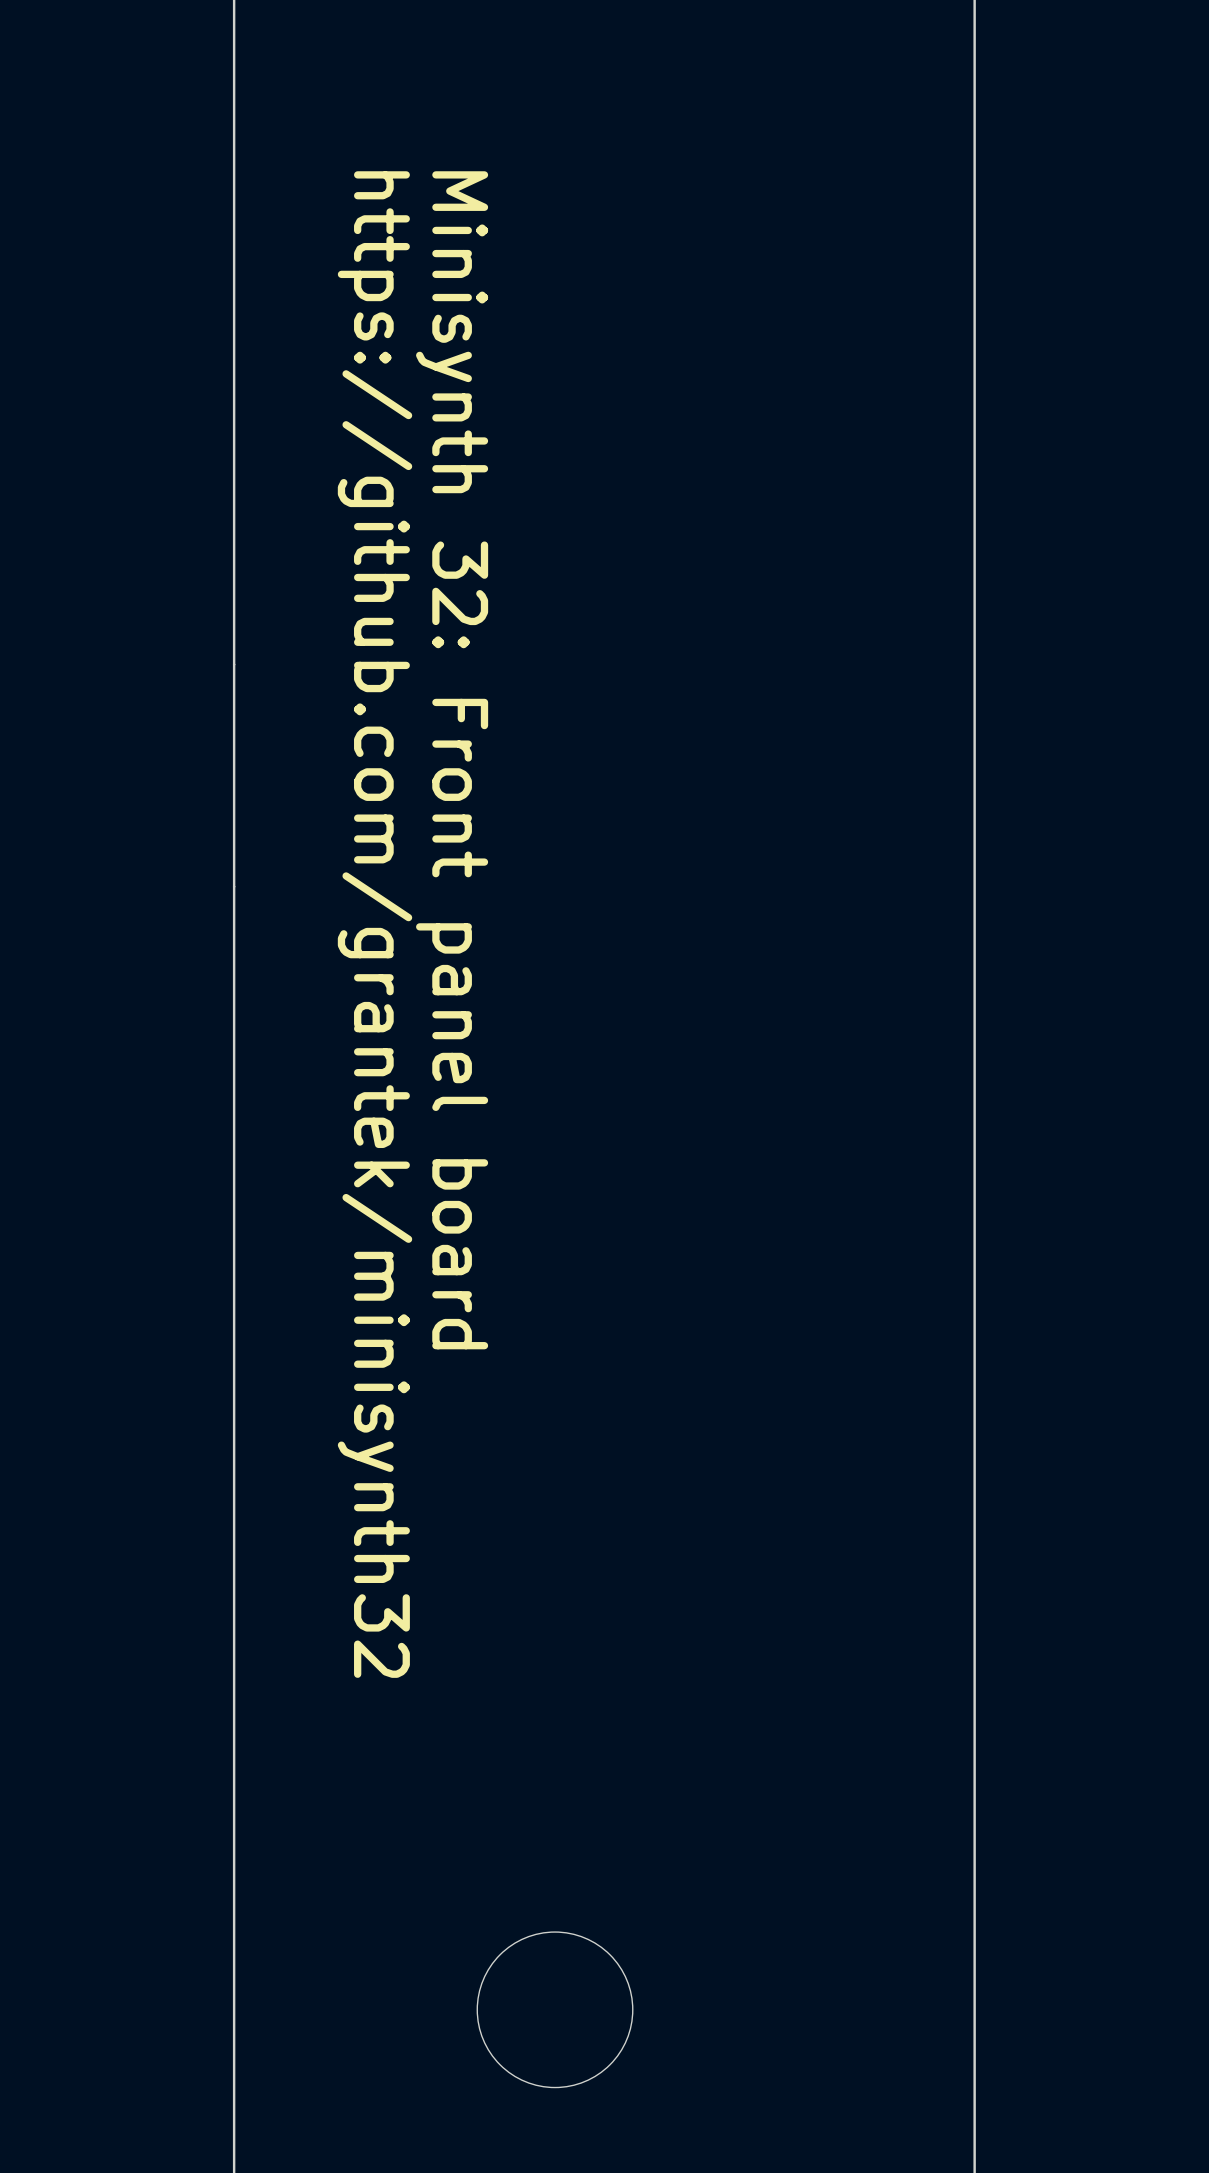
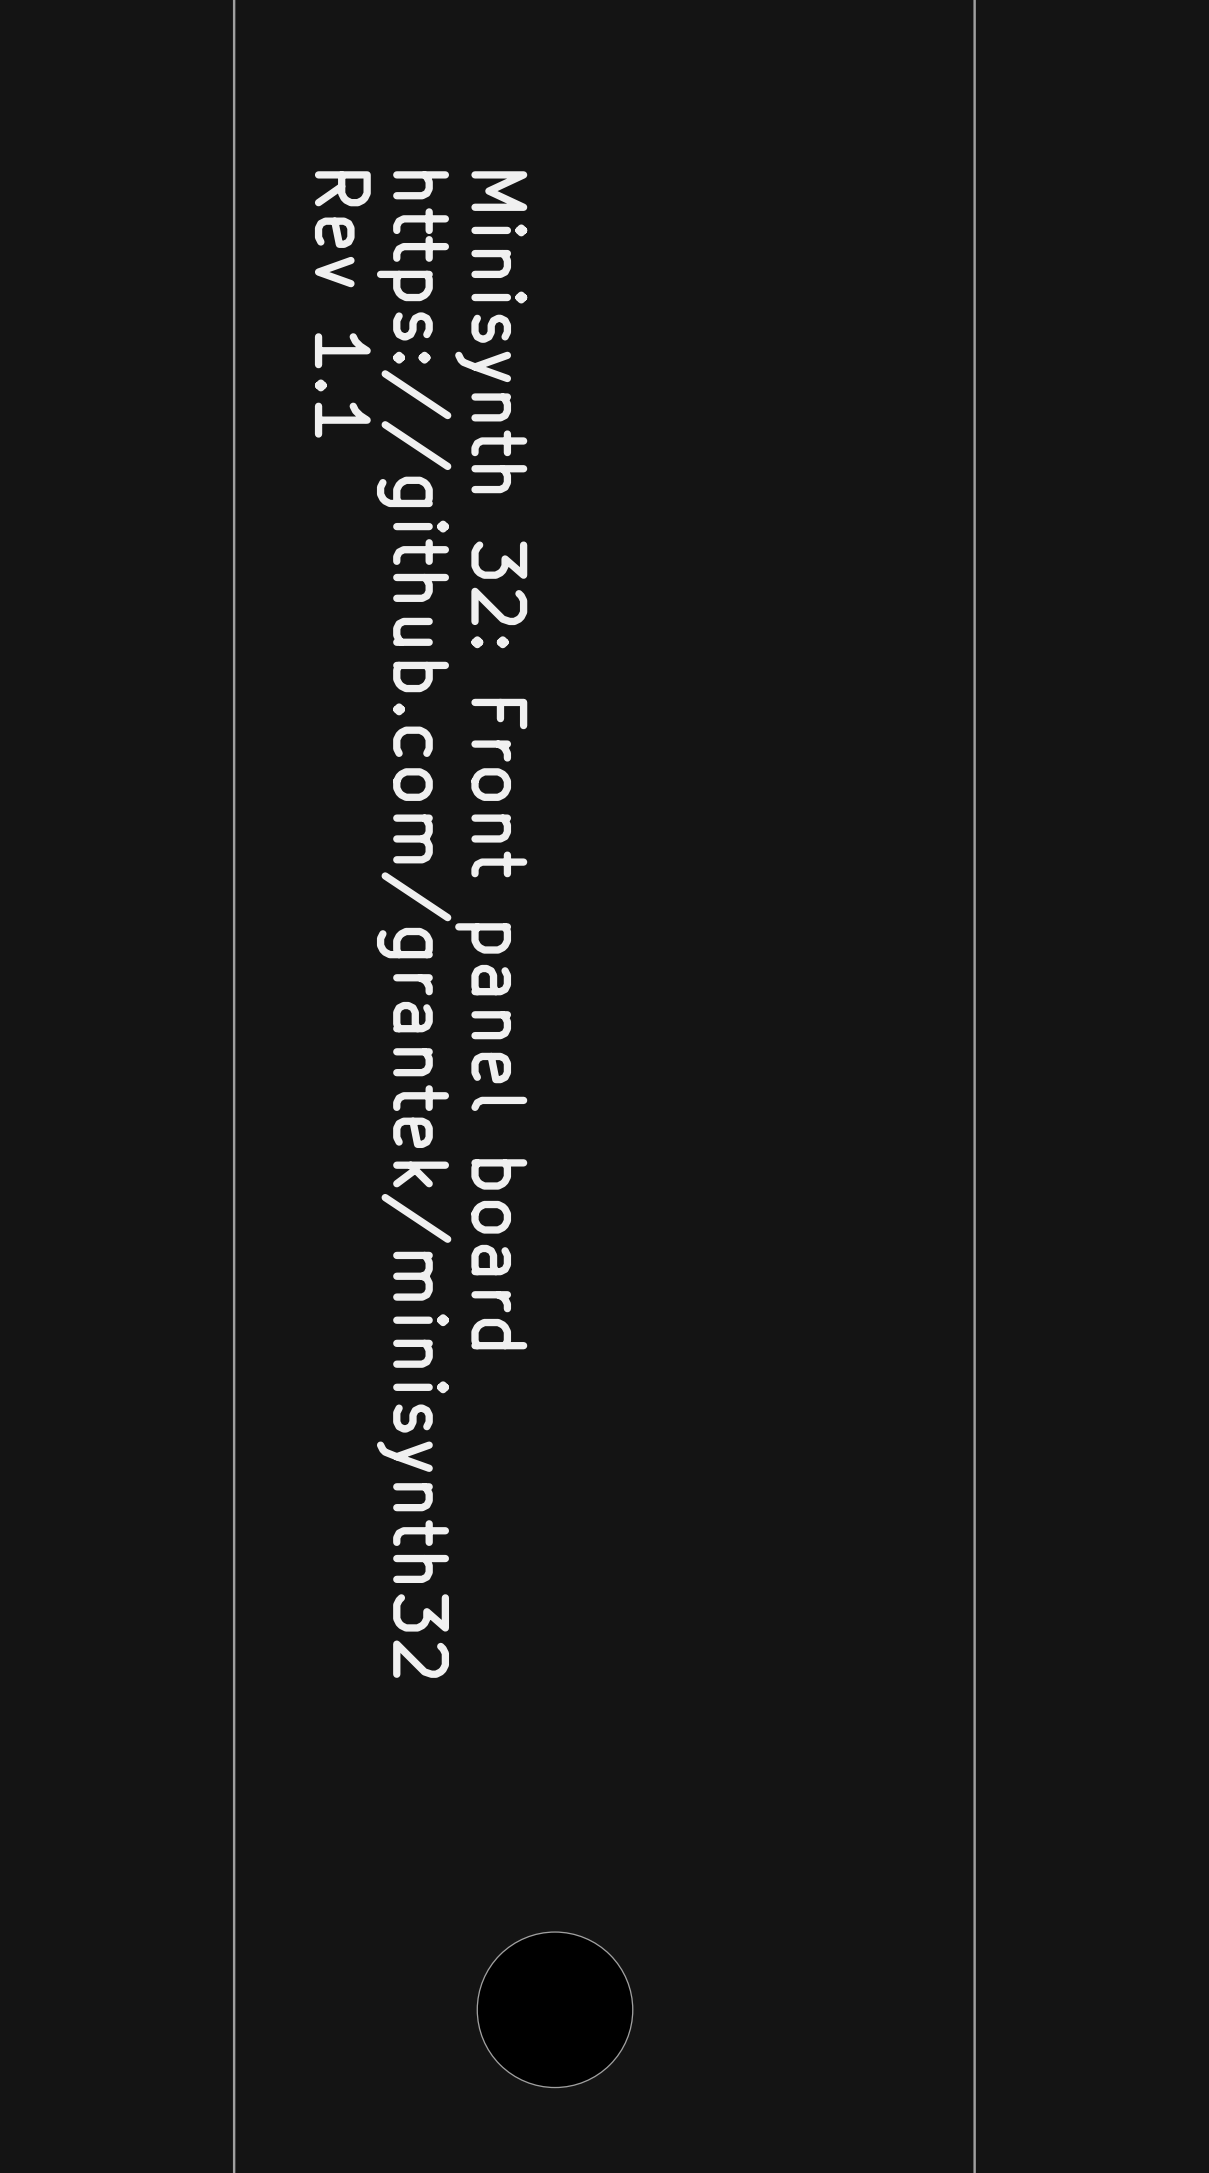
text: none -> Rev 1.1 (342, 304)
text position: Minisynth 32: Front panel board (452, 760) -> Minisynth 32: Front panel board (491, 760)
text position: https://github.com/grantek/minisynth32 (375, 924) -> https://github.com/grantek/minisynth32 (414, 924)

